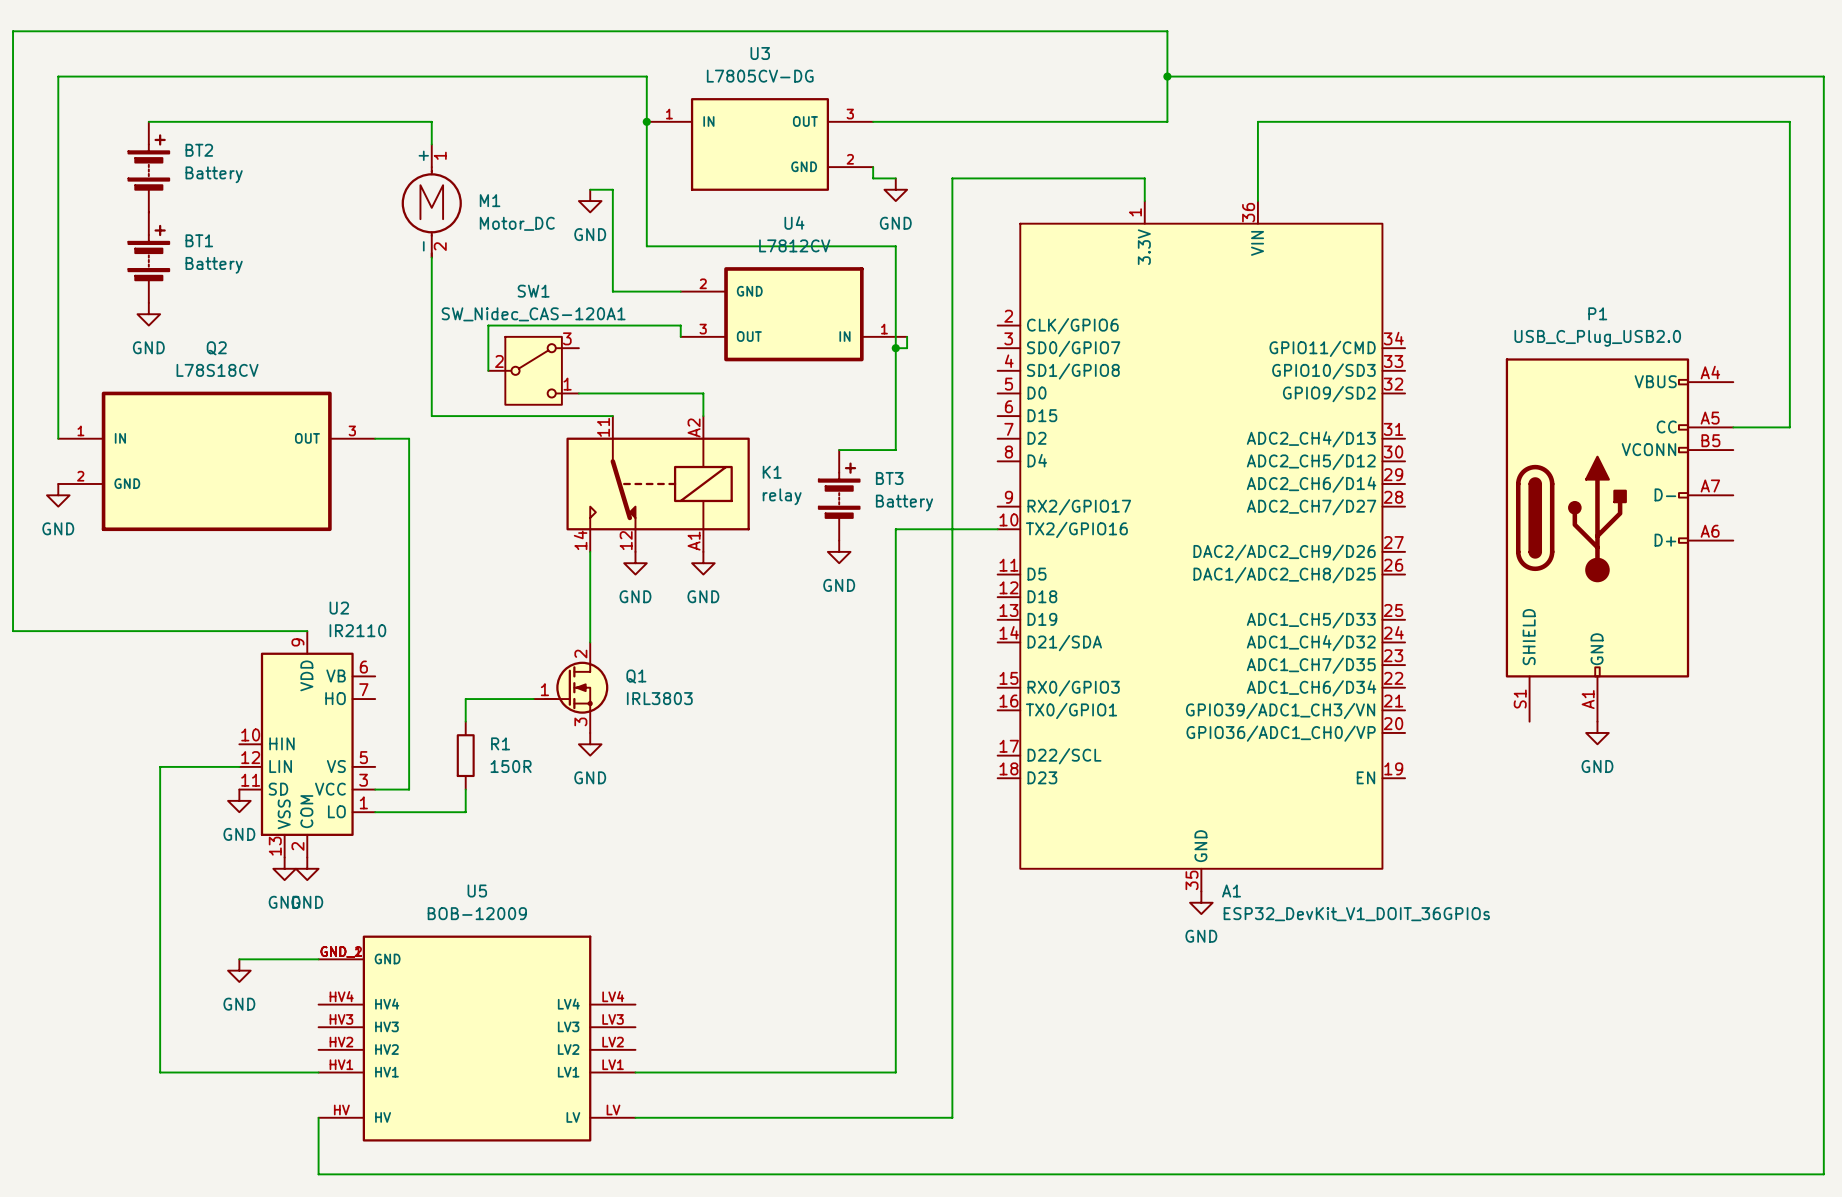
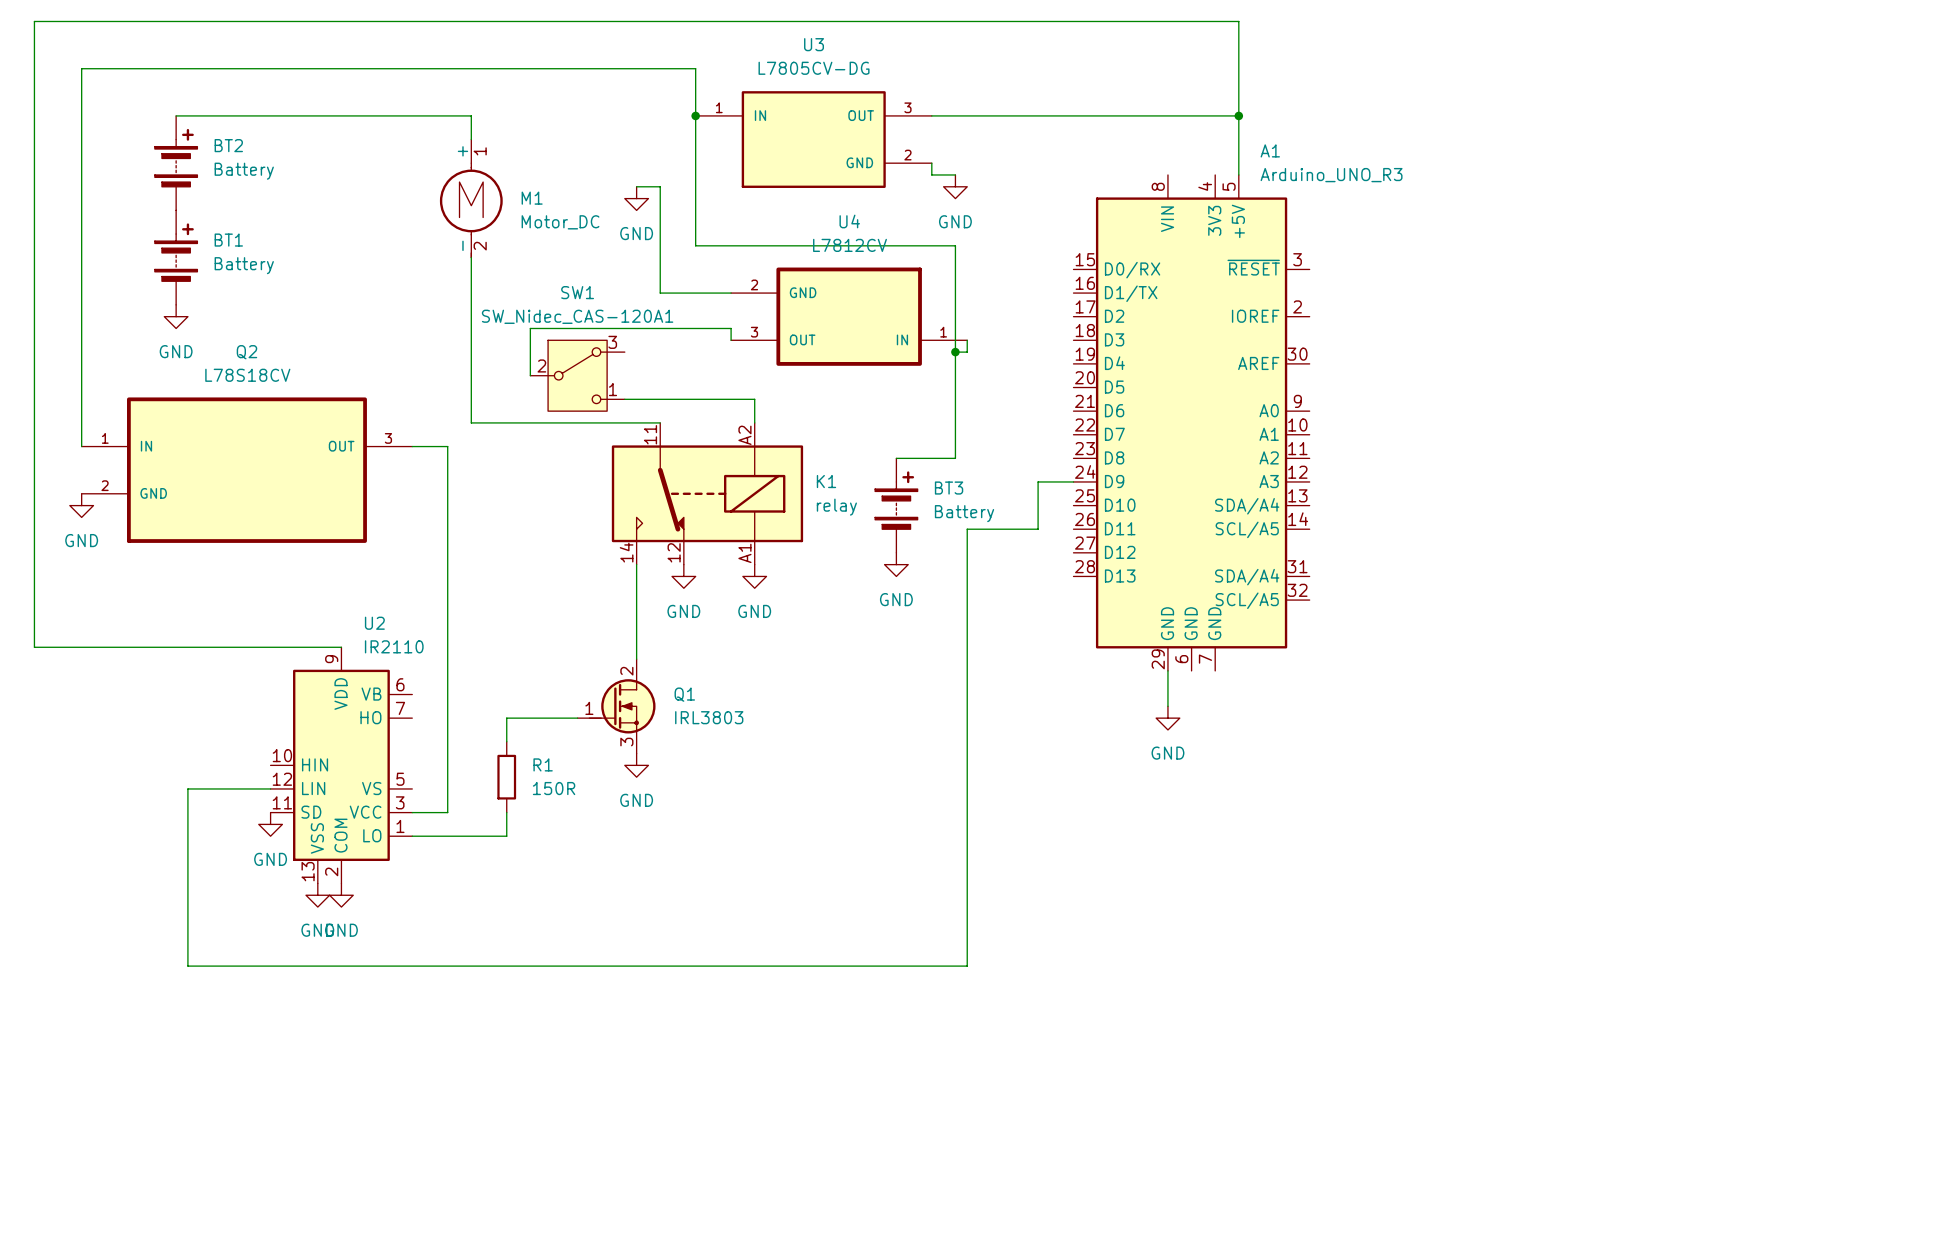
wire: (1167, 76) (1823, 76) (1823, 1174) (318, 1174) (318, 1117) -> none
junction position: (1167, 76) -> (1238, 115)
wire: none -> (1238, 115) (1238, 174)
A1 symbol: [997, 201, 1406, 892] -> [1073, 174, 1310, 671]
wire: (1144, 201) (1144, 178) (952, 178) (952, 1117) (635, 1117) -> none
wire: (1257, 201) (1257, 121) (1789, 121) (1789, 427) (1733, 427) -> none
wire: (997, 529) (895, 529) (895, 1072) (635, 1072) -> none
P1: USB_C_Plug_USB2.0 (1619, 540) -> none
power symbol: none -> GND (1167, 718)
power symbol: GND (1597, 732) -> none
A1 name position: A1 (1231, 891) -> A1 (1270, 150)
power symbol: GND (1201, 902) -> none
A1 value: ESP32_DevKit_V1_DOIT_36GPIOs (1356, 914) -> Arduino_UNO_R3 (1331, 175)
wire: (160, 936) (160, 1072) (318, 1072) -> (187, 966) (967, 966) (967, 529) (1038, 529) (1038, 481) (1073, 481)
wire: (239, 959) (318, 959) -> none
power symbol: GND (239, 970) -> none
U5: BOB-12009 (477, 1038) -> none

